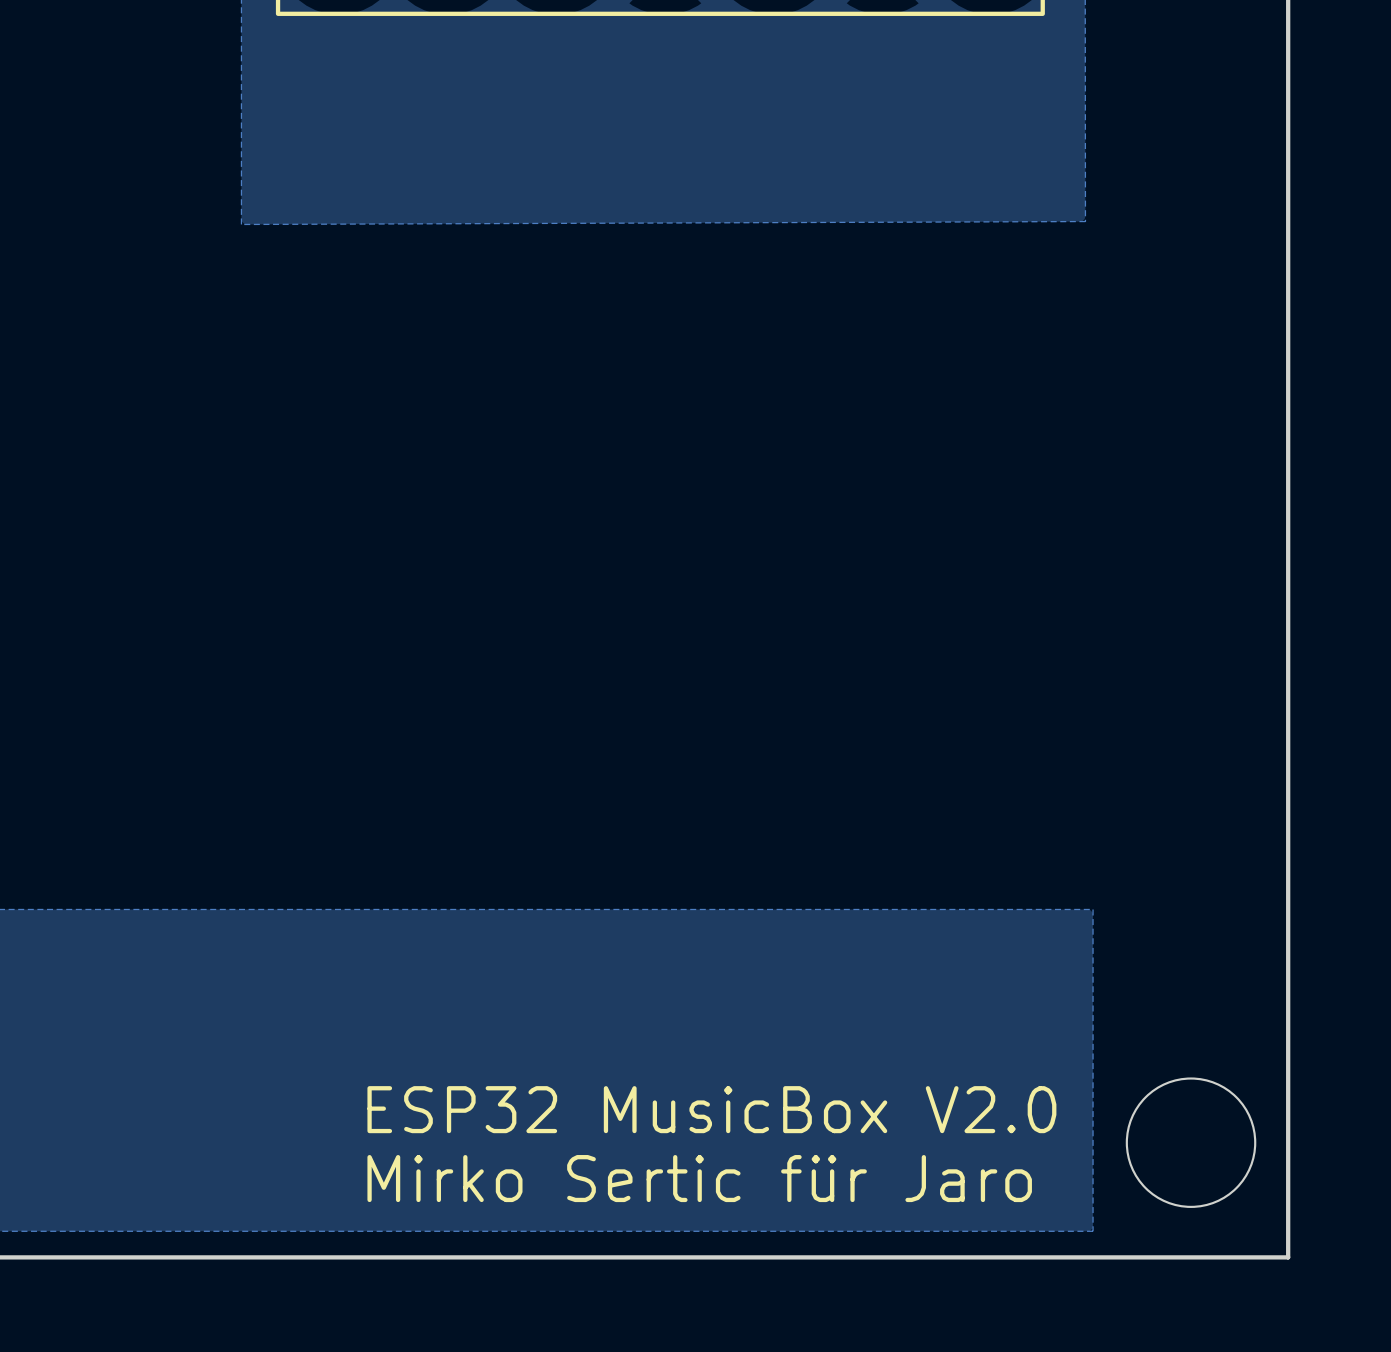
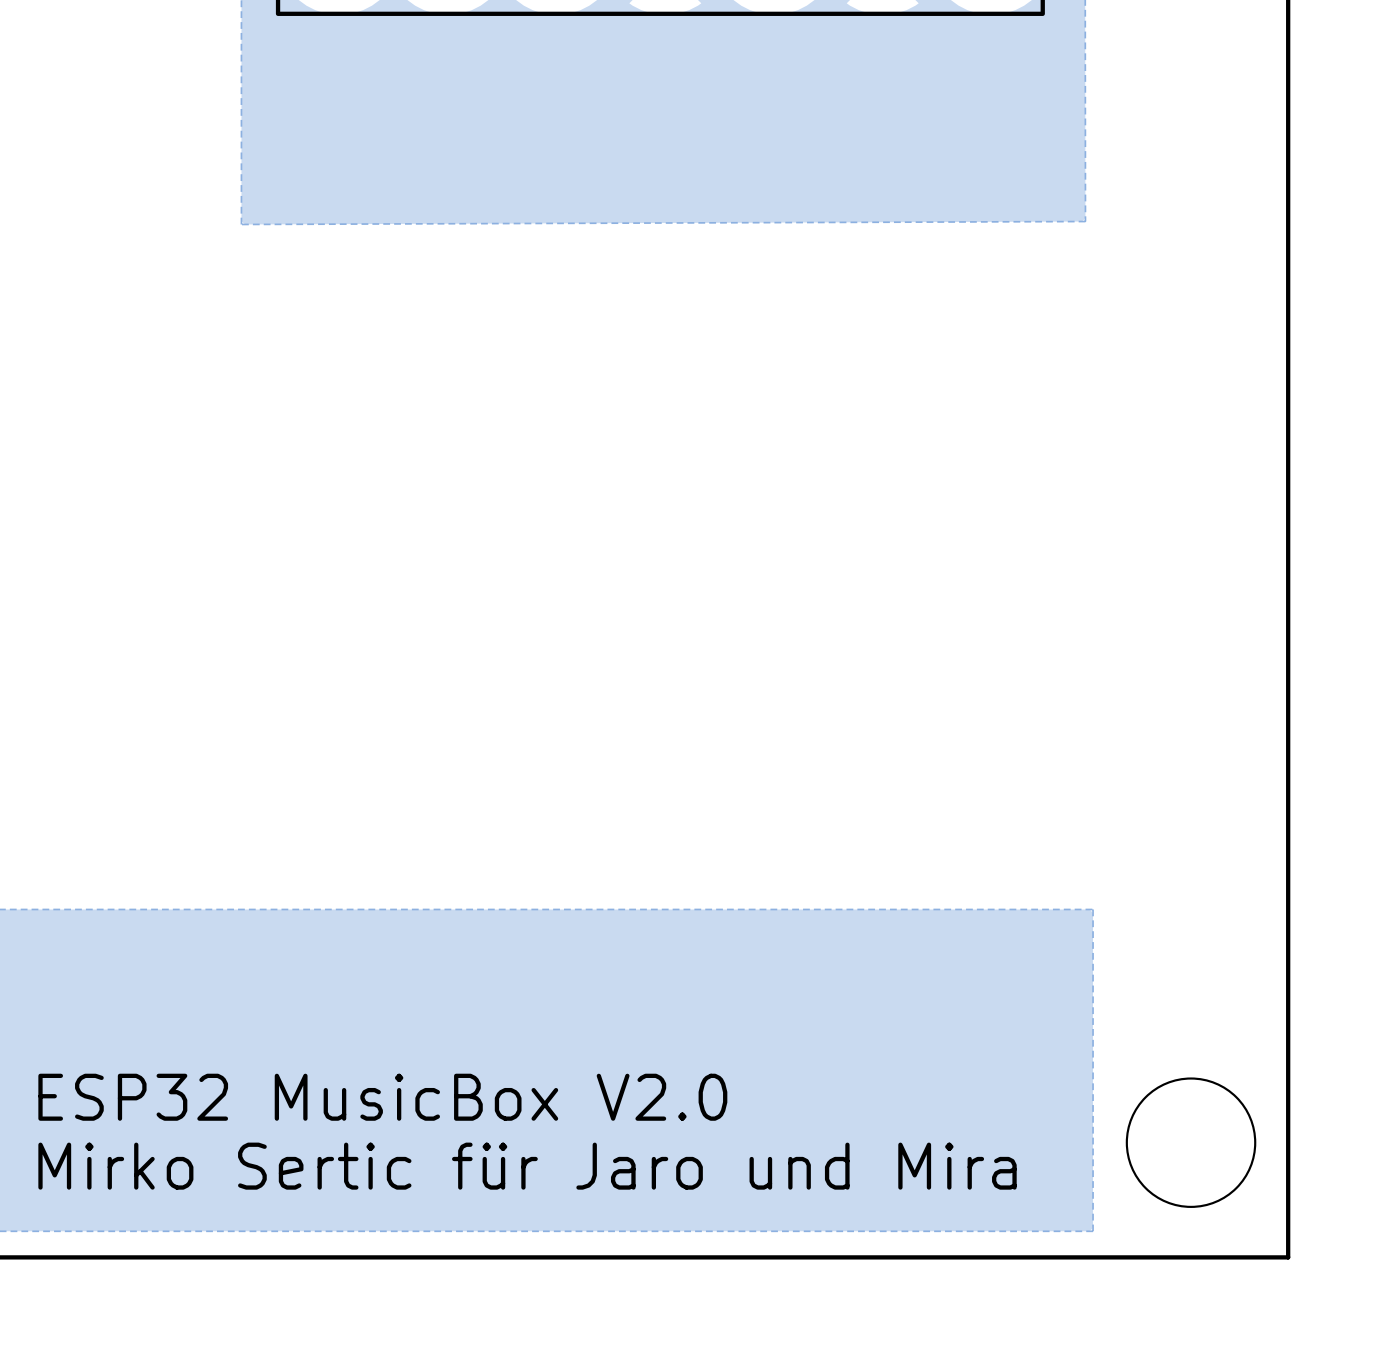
text position: ESP32 MusicBox V2.0 (711, 1109) -> ESP32 MusicBox V2.0 (382, 1097)
text: Mirko Sertic für Jaro (699, 1178) -> Mirko Sertic für Jaro und Mira (527, 1166)

